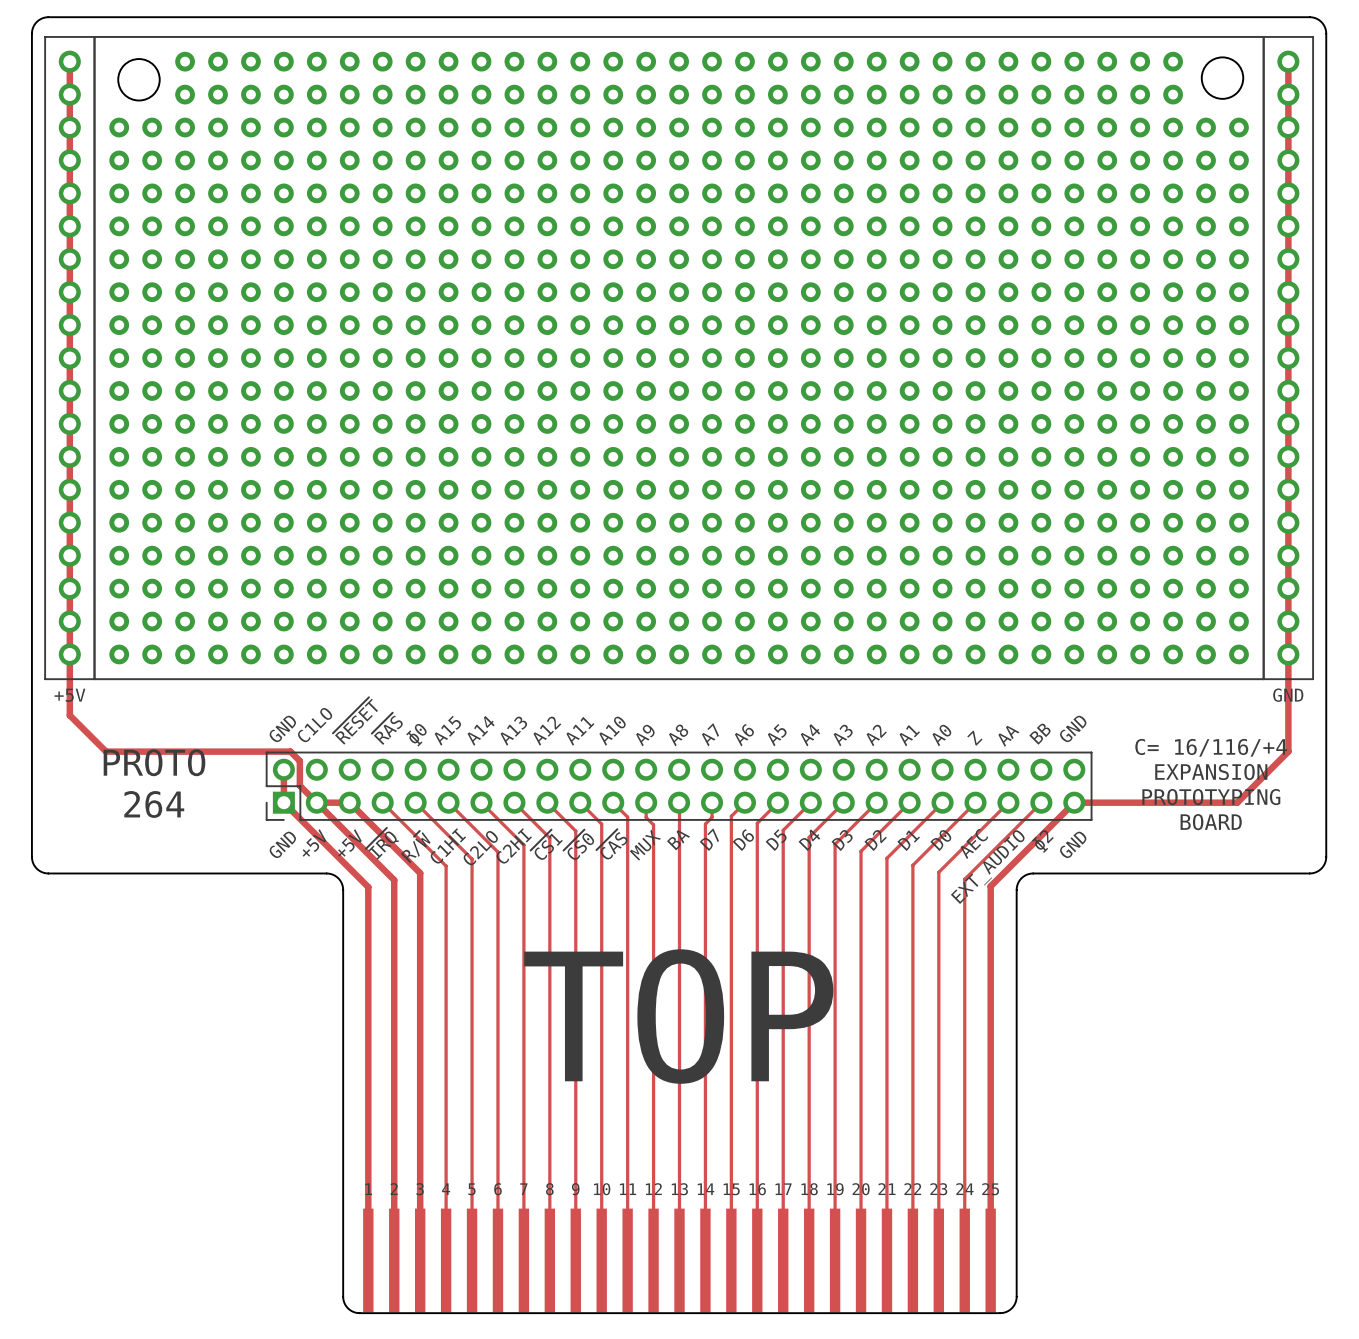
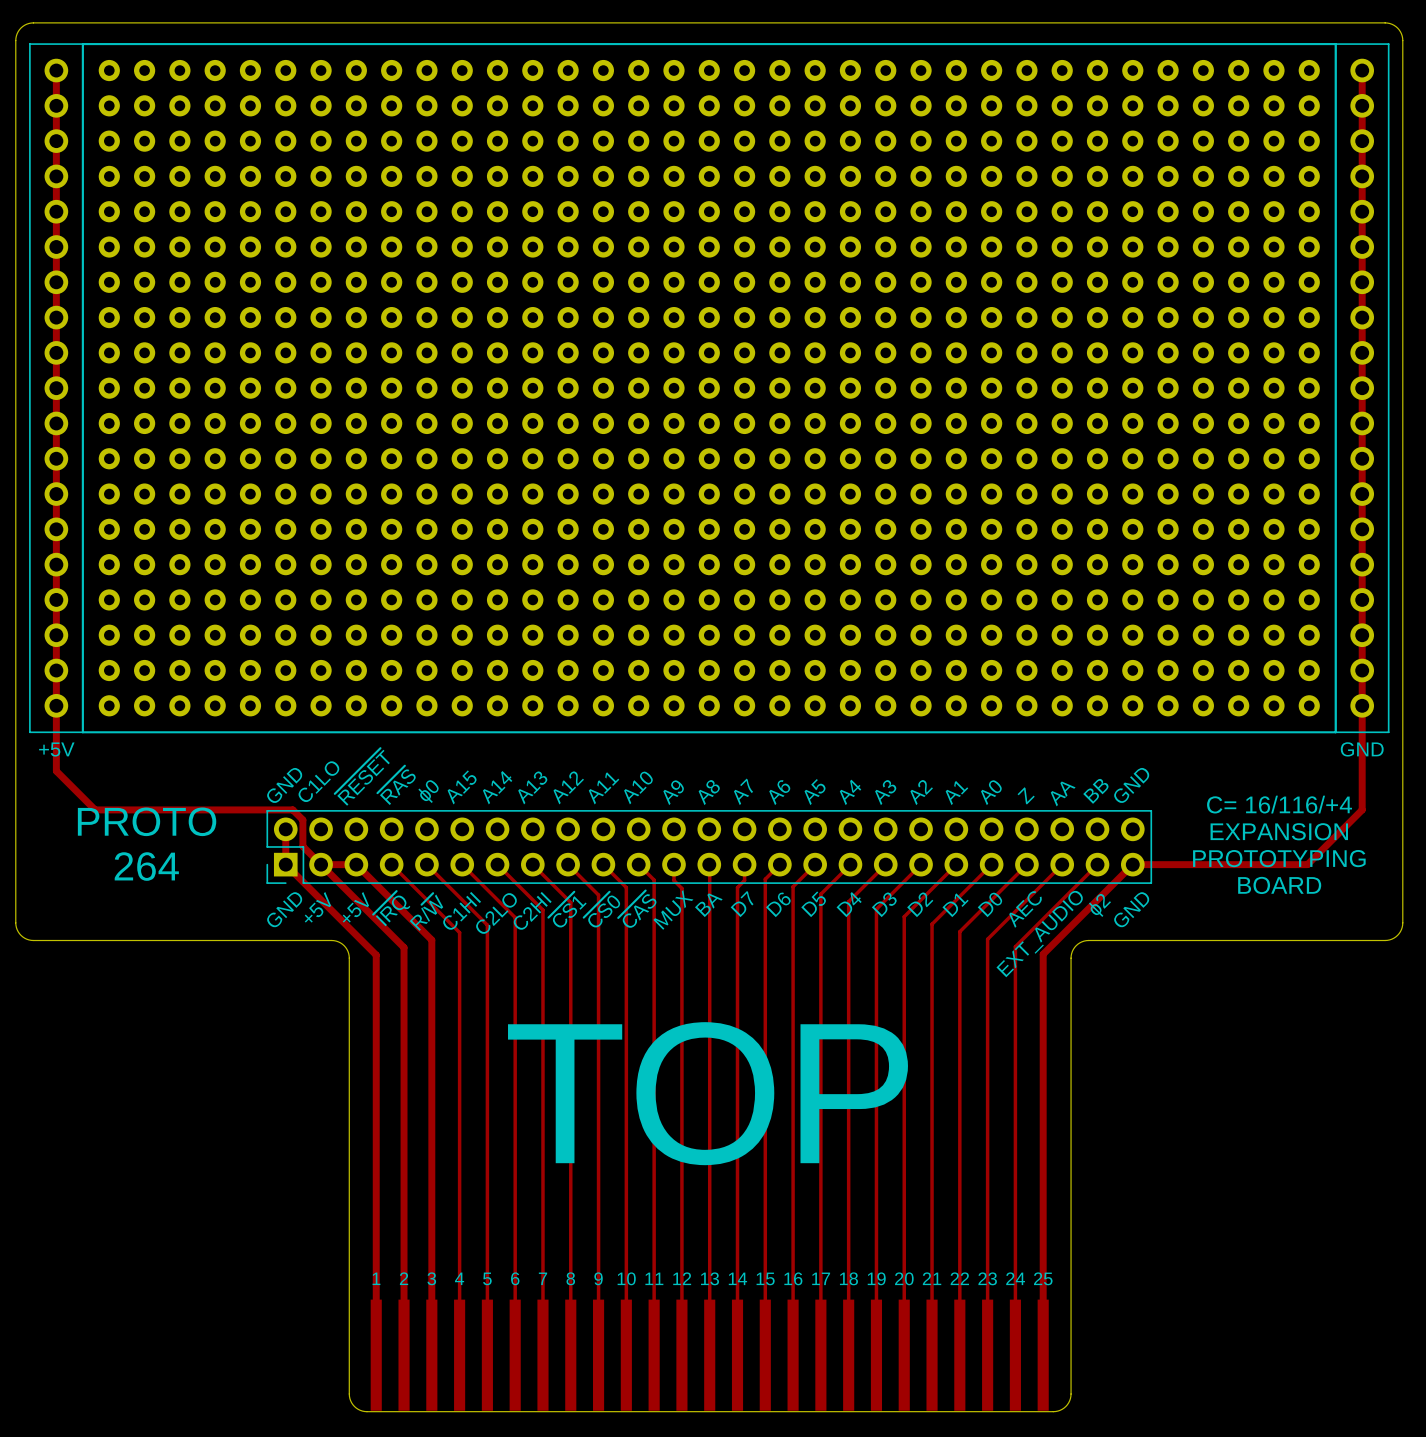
part footprint: [93, 35, 1265, 681] -> [81, 43, 1337, 734]

